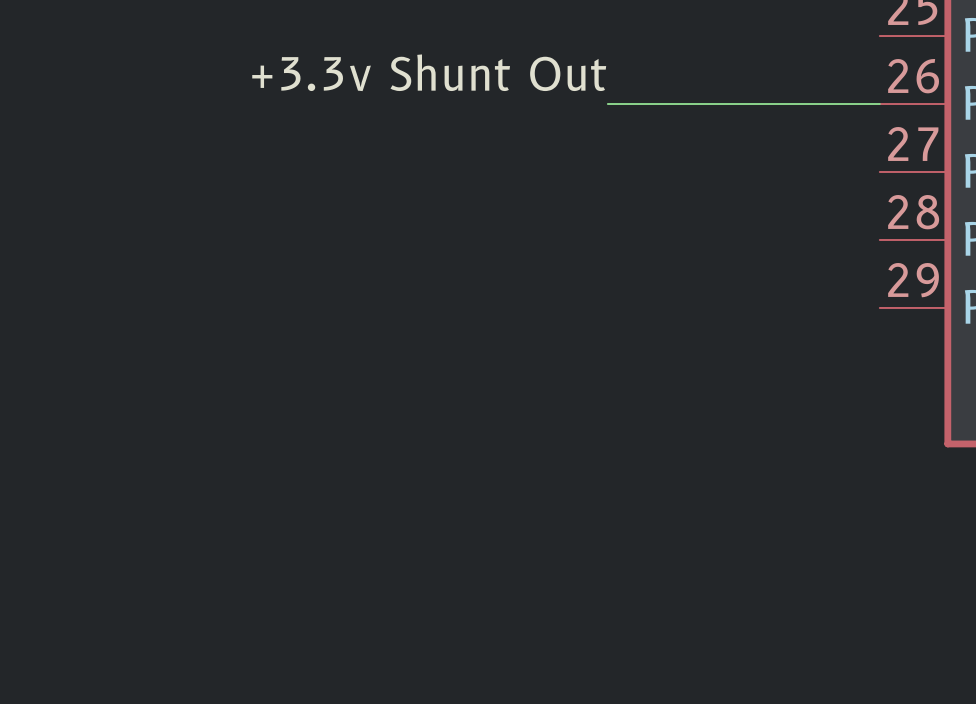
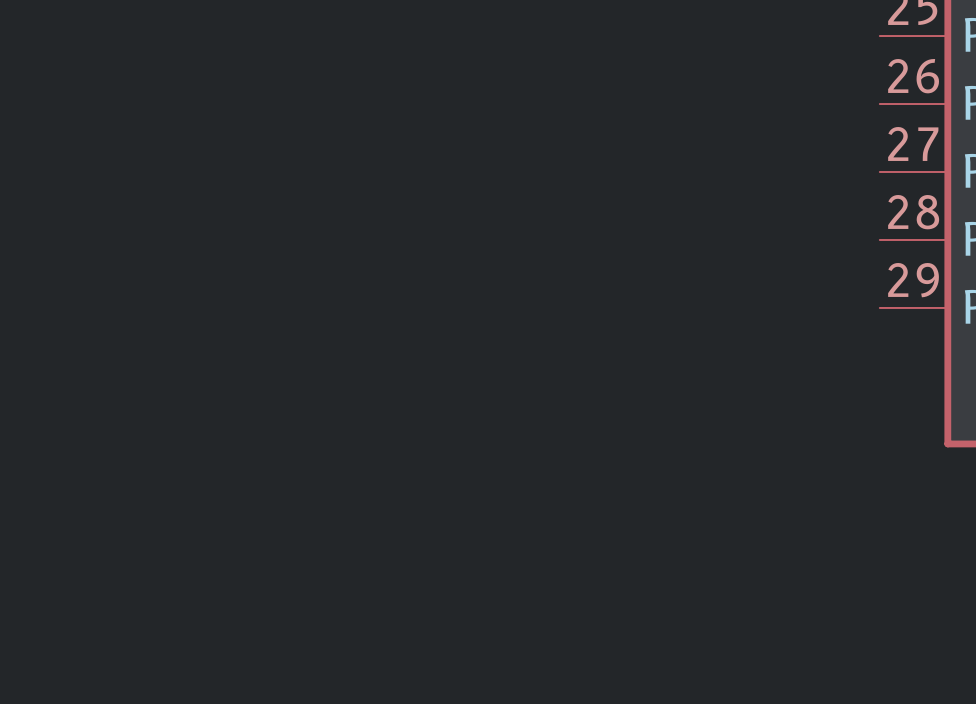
label: +3.3v Shunt Out (429, 72) -> none
wire: (607, 104) (879, 104) -> none

